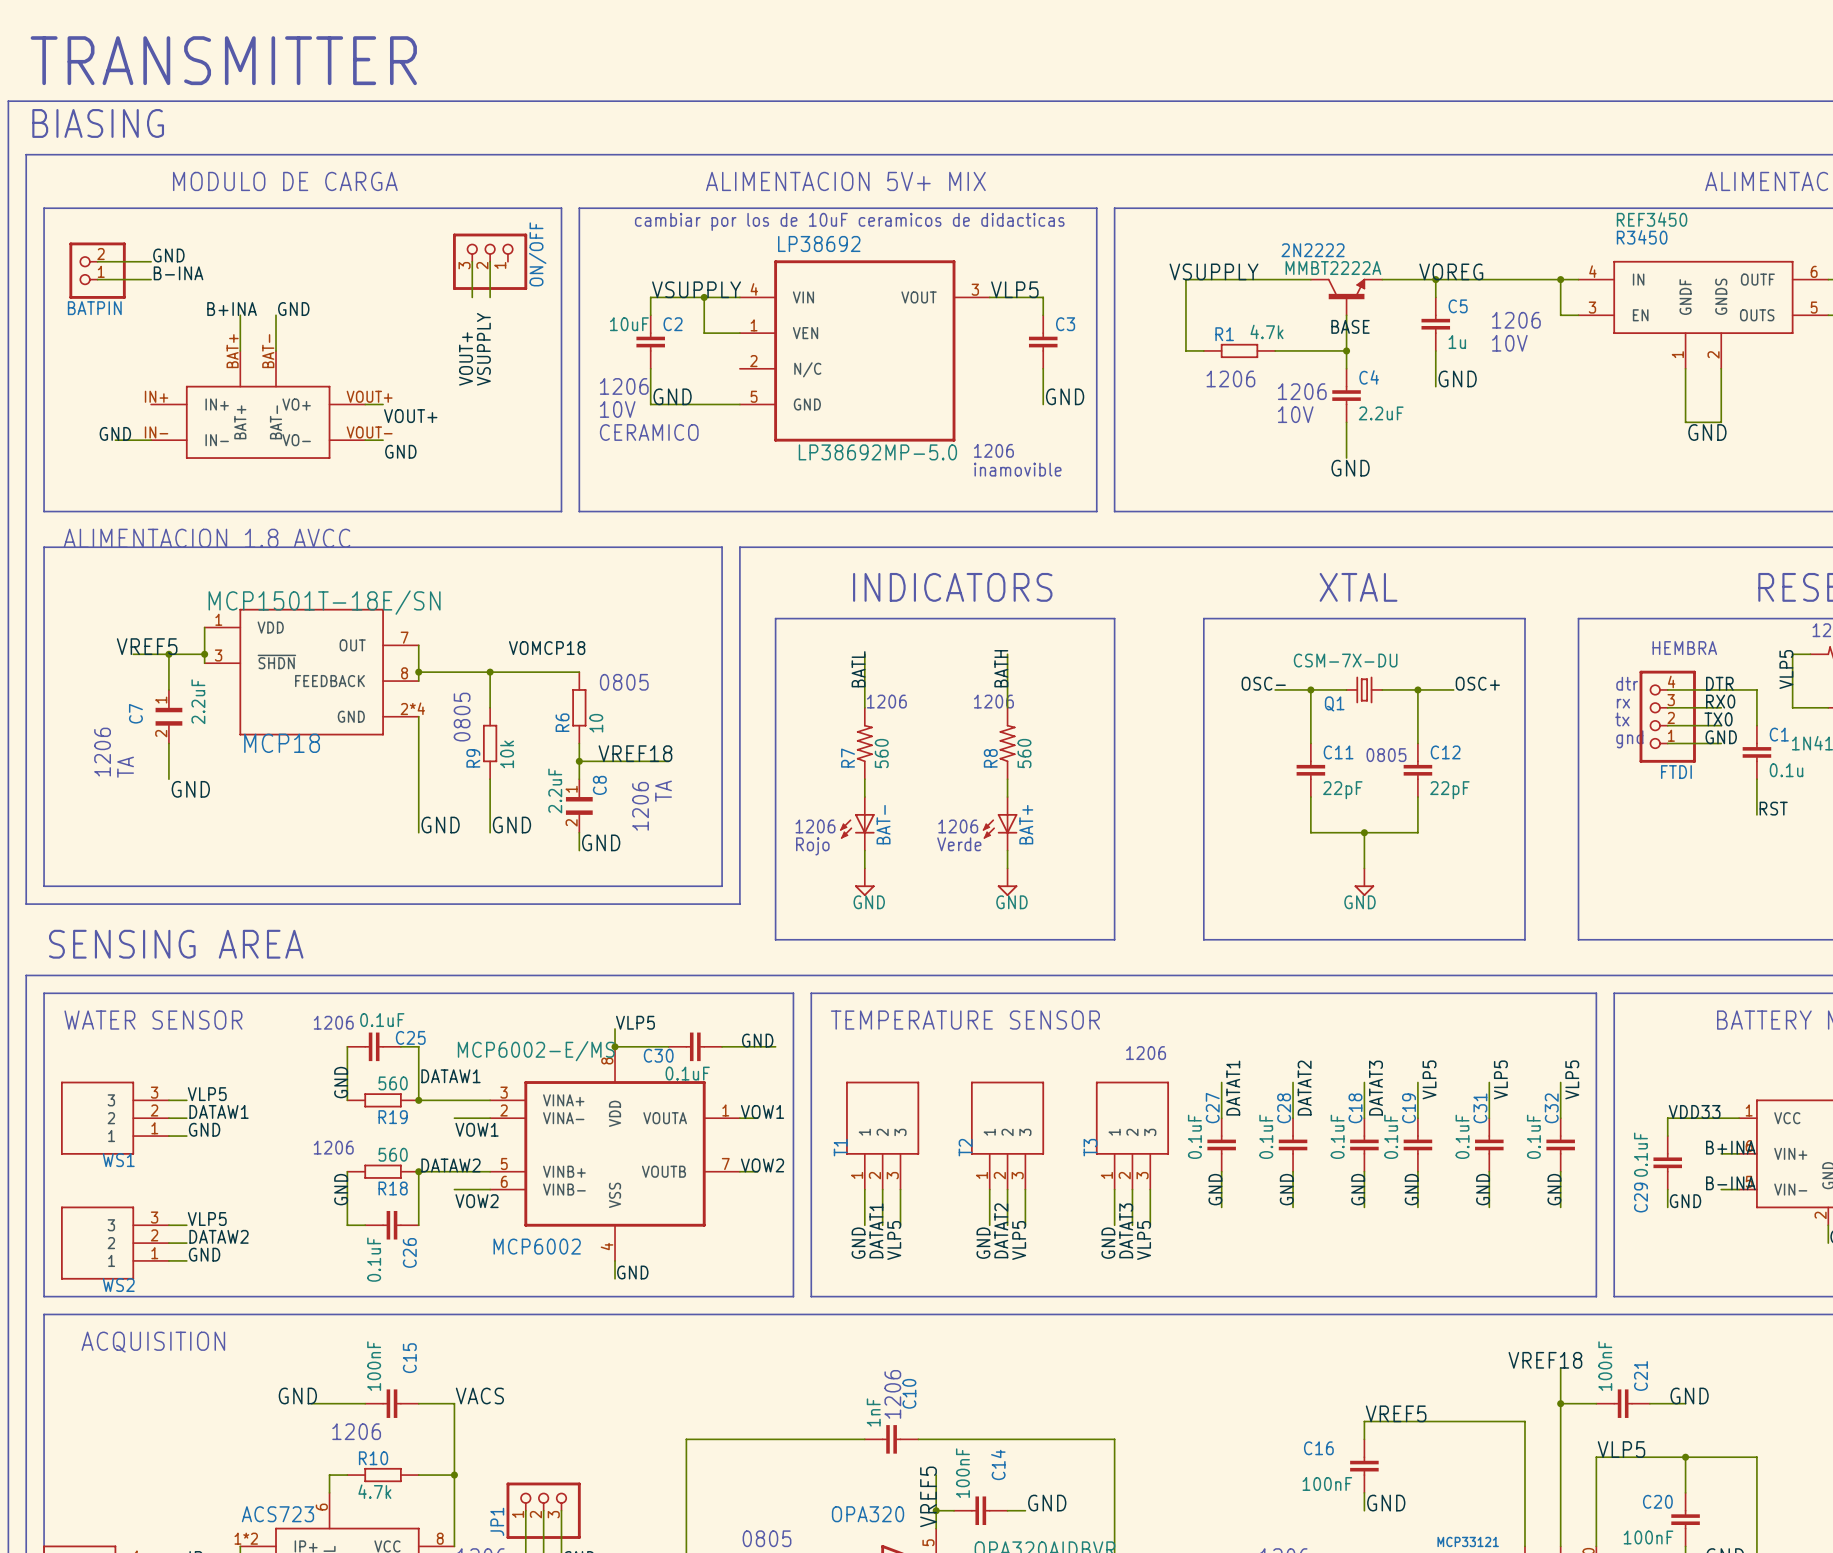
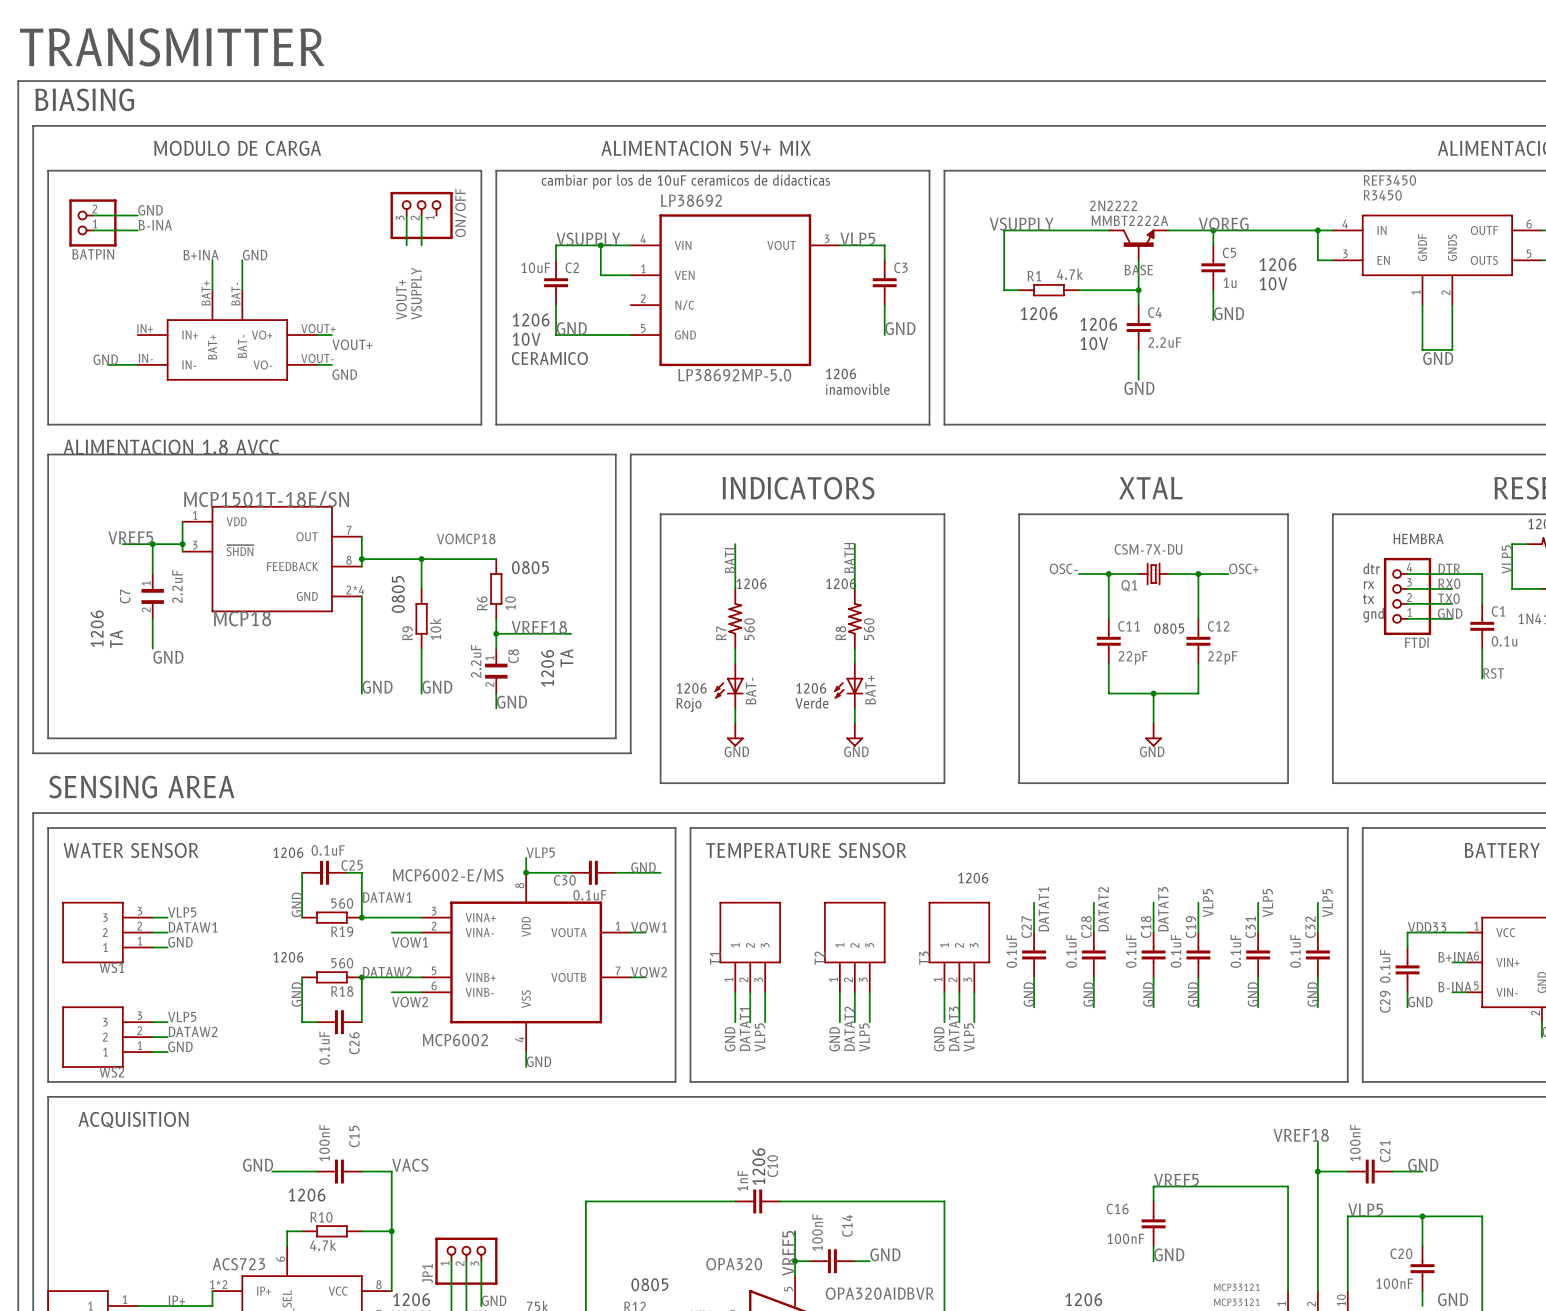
text position: TRANSMITTER (223, 60) -> TRANSMITTER (172, 47)

